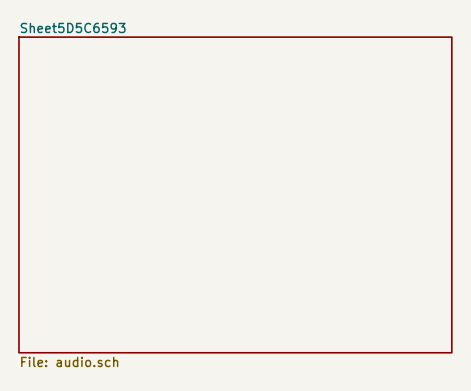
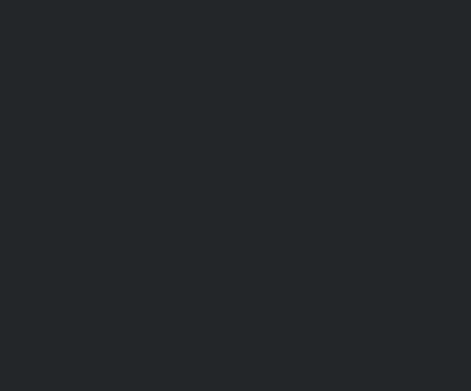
sheet Sheet5D5C6593: File: audio.sch (235, 194) -> none

